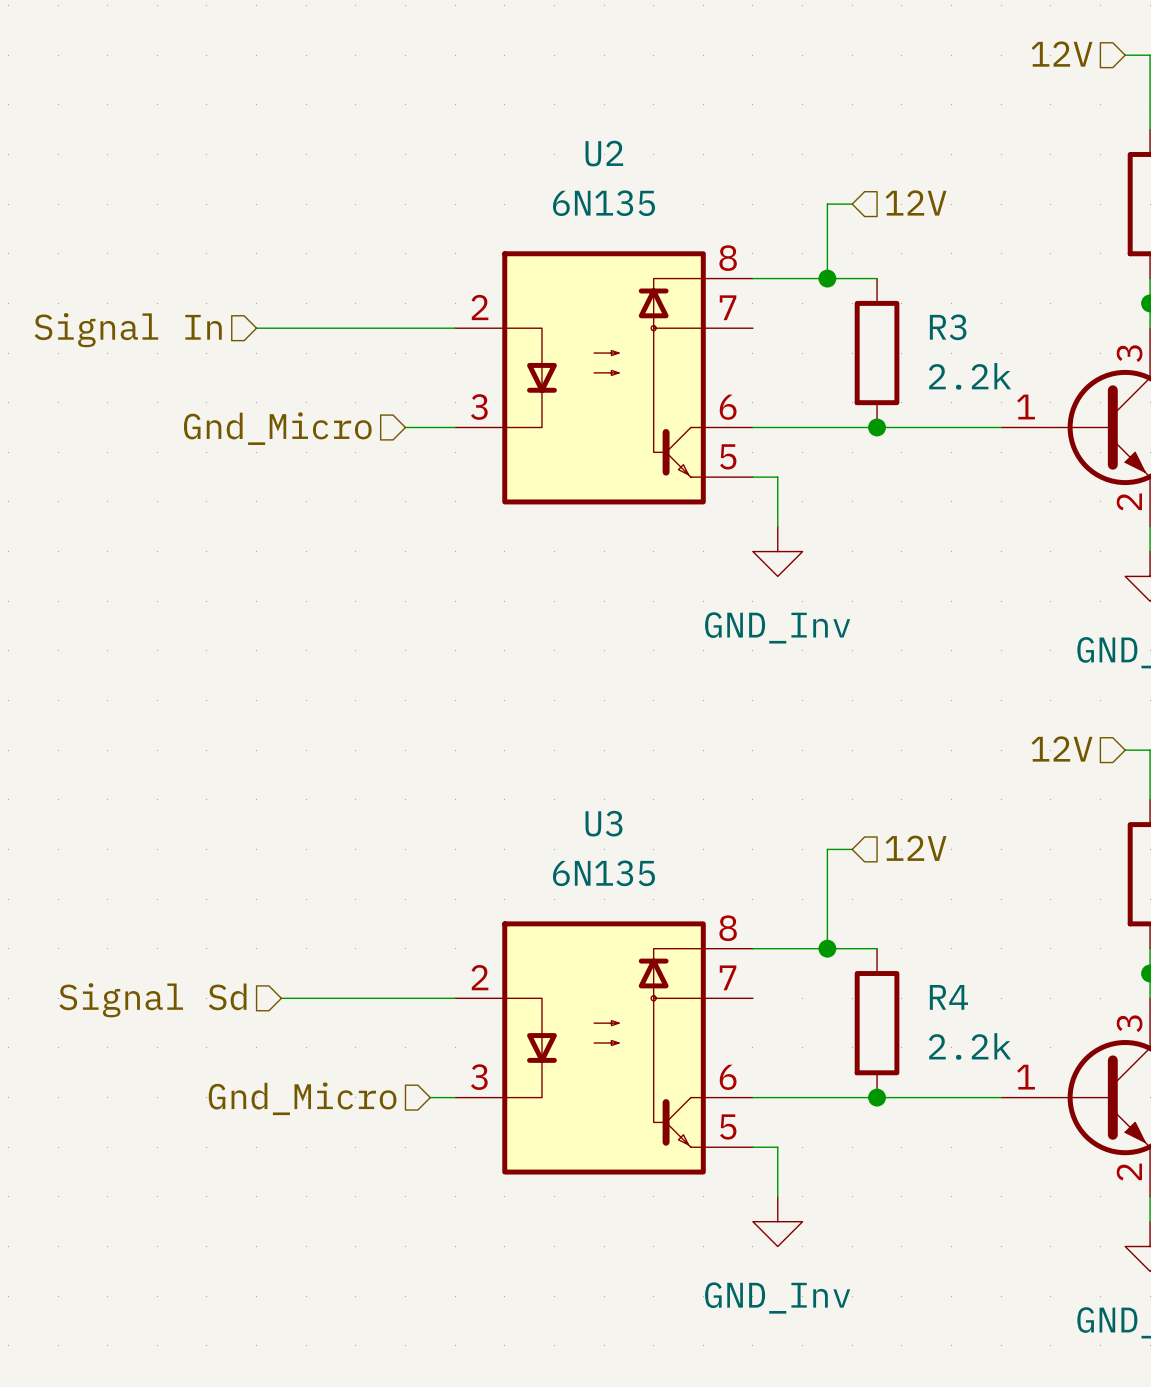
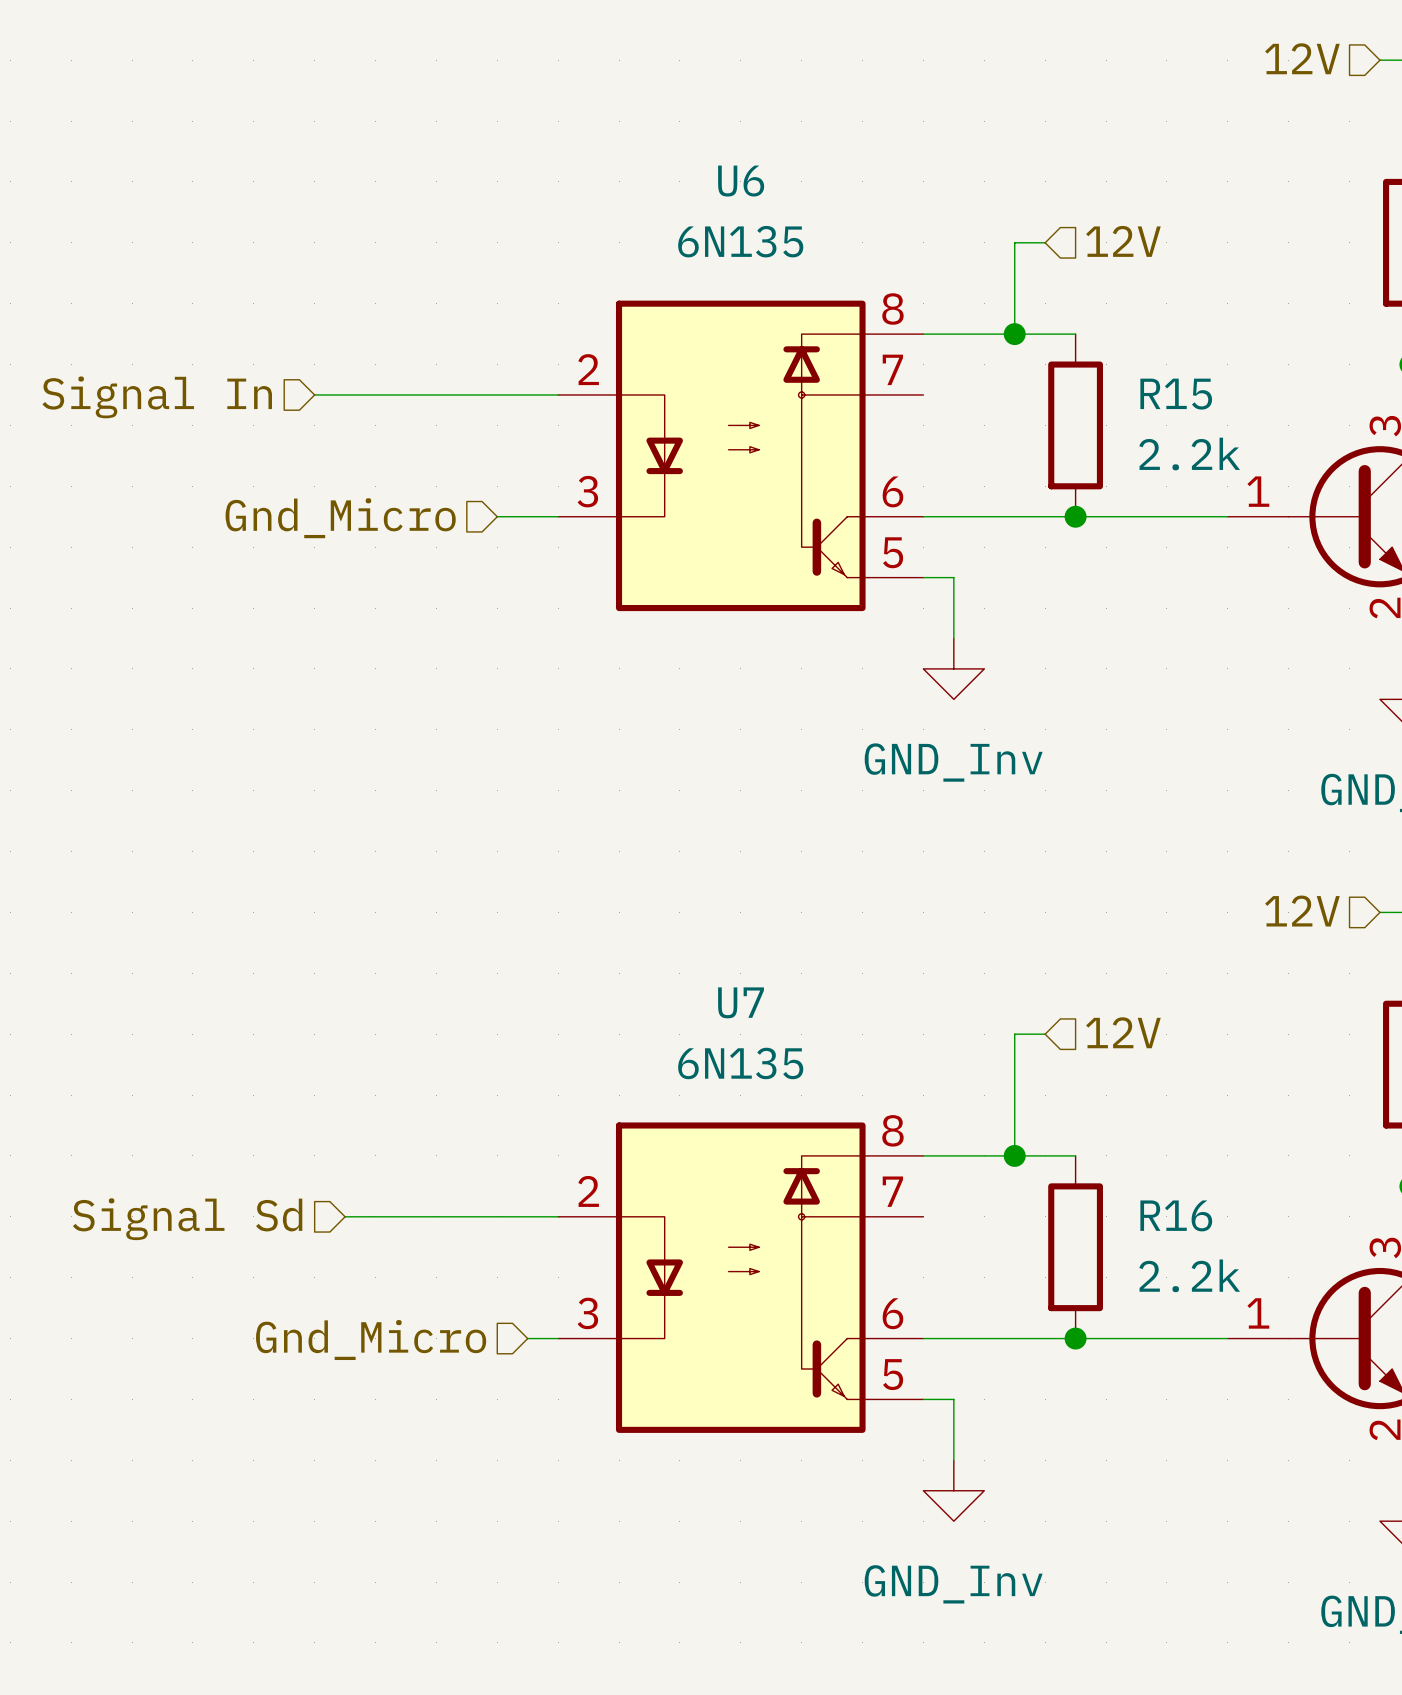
U2 name: U2 (604, 153) -> U6 (741, 181)
R3 name: R3 (948, 327) -> R15 (1176, 394)
U3 name: U3 (603, 823) -> U7 (741, 1002)
R4 name: R4 (948, 997) -> R16 (1176, 1215)

